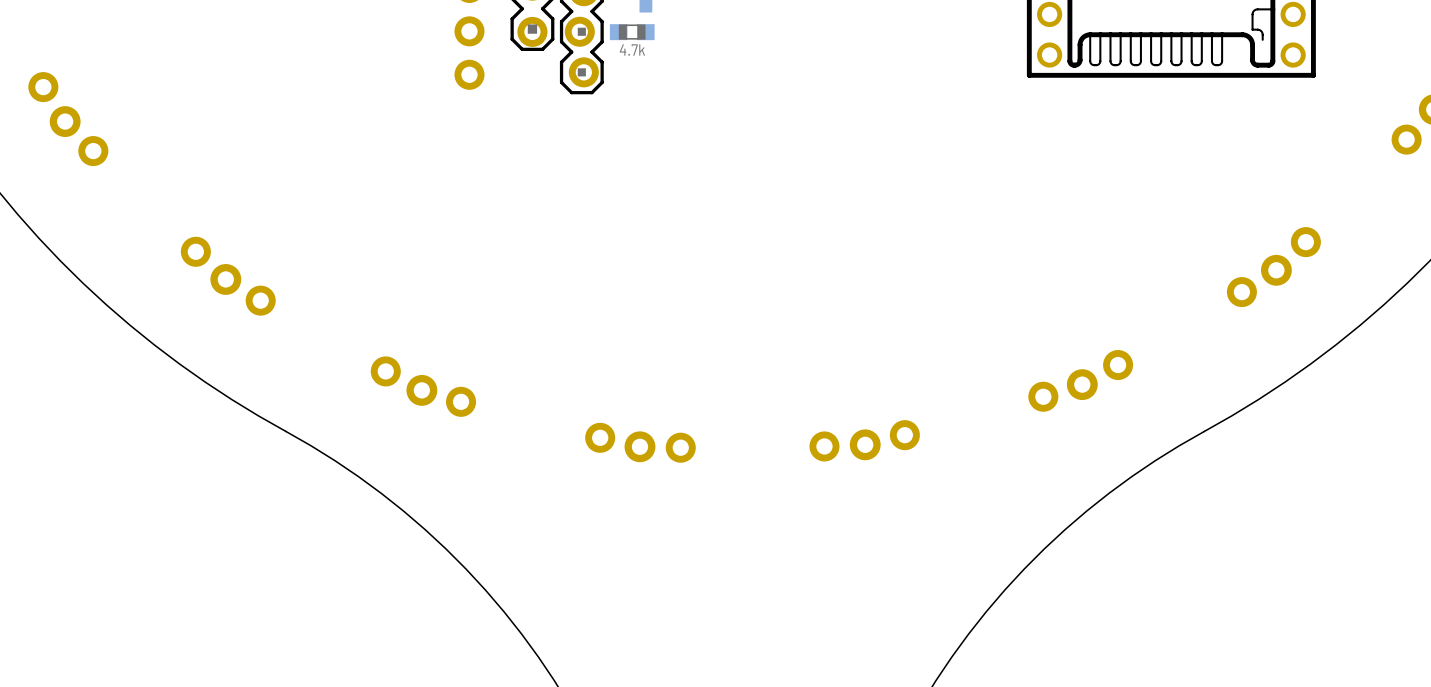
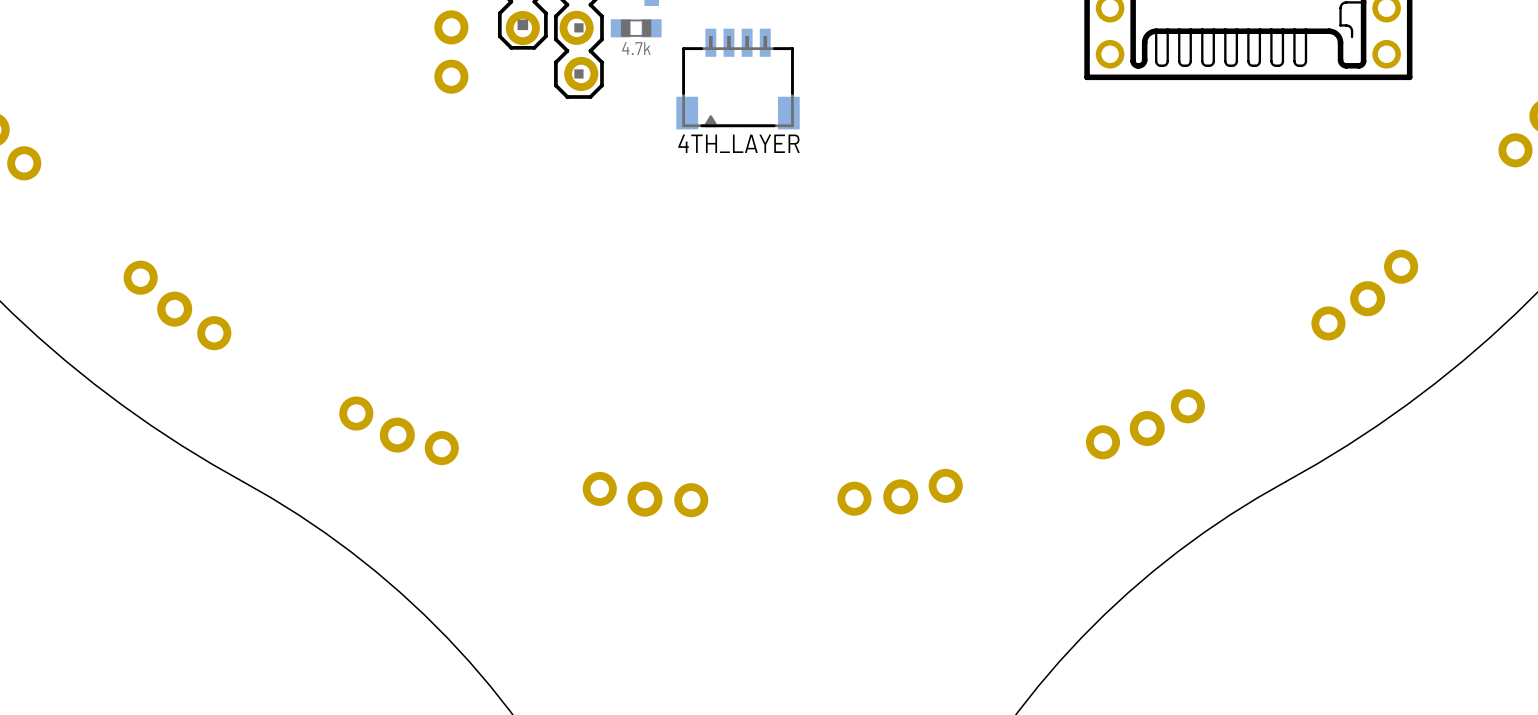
4TH_LAYER: none -> (738, 79)

